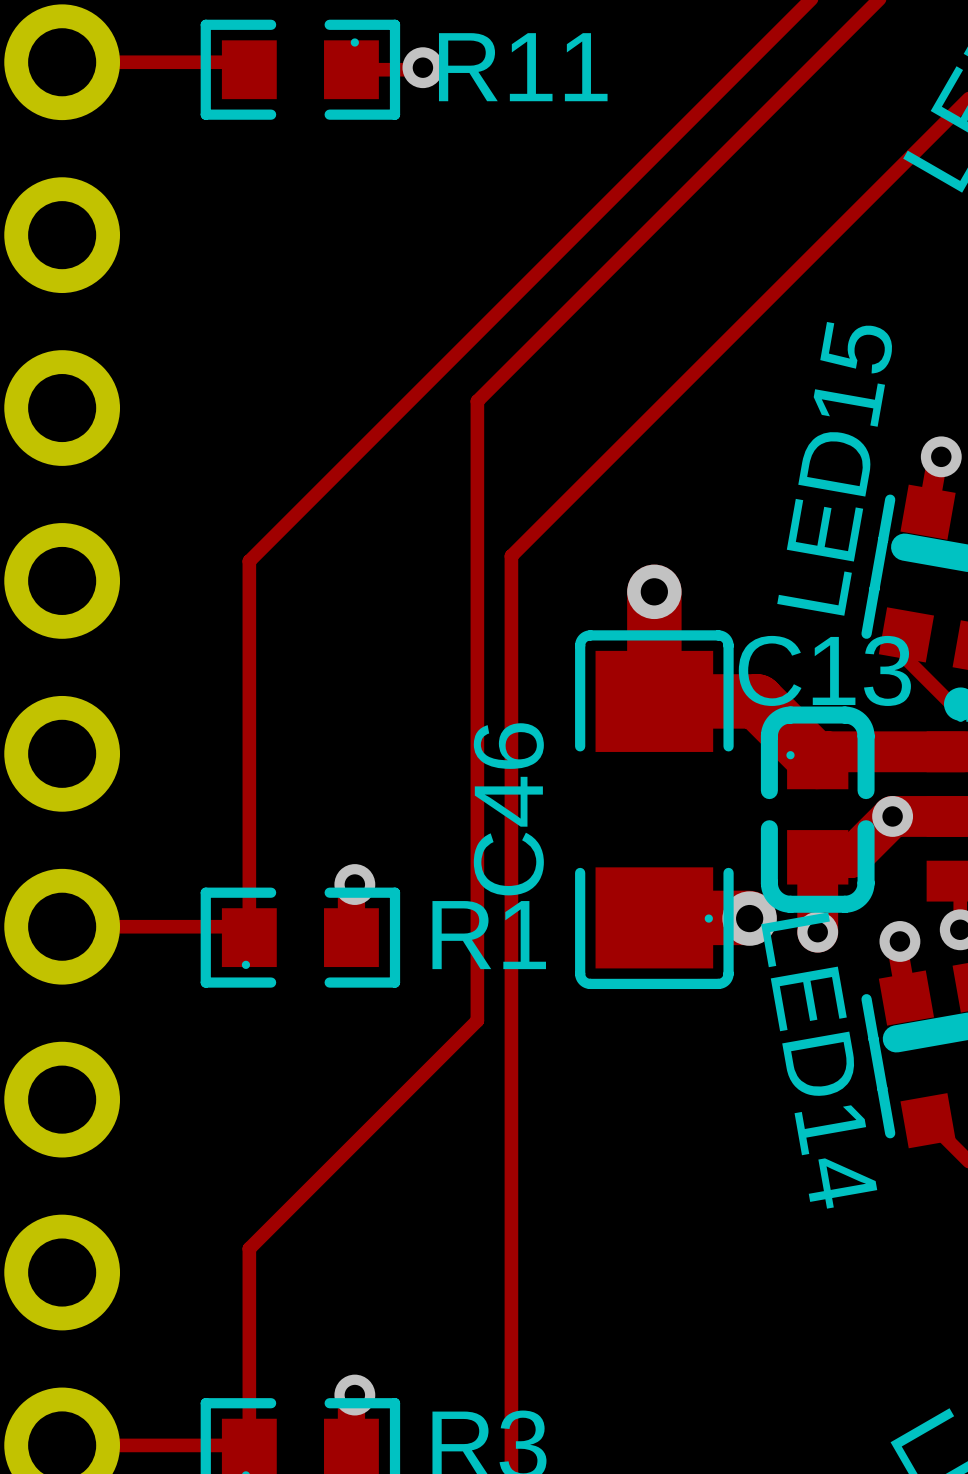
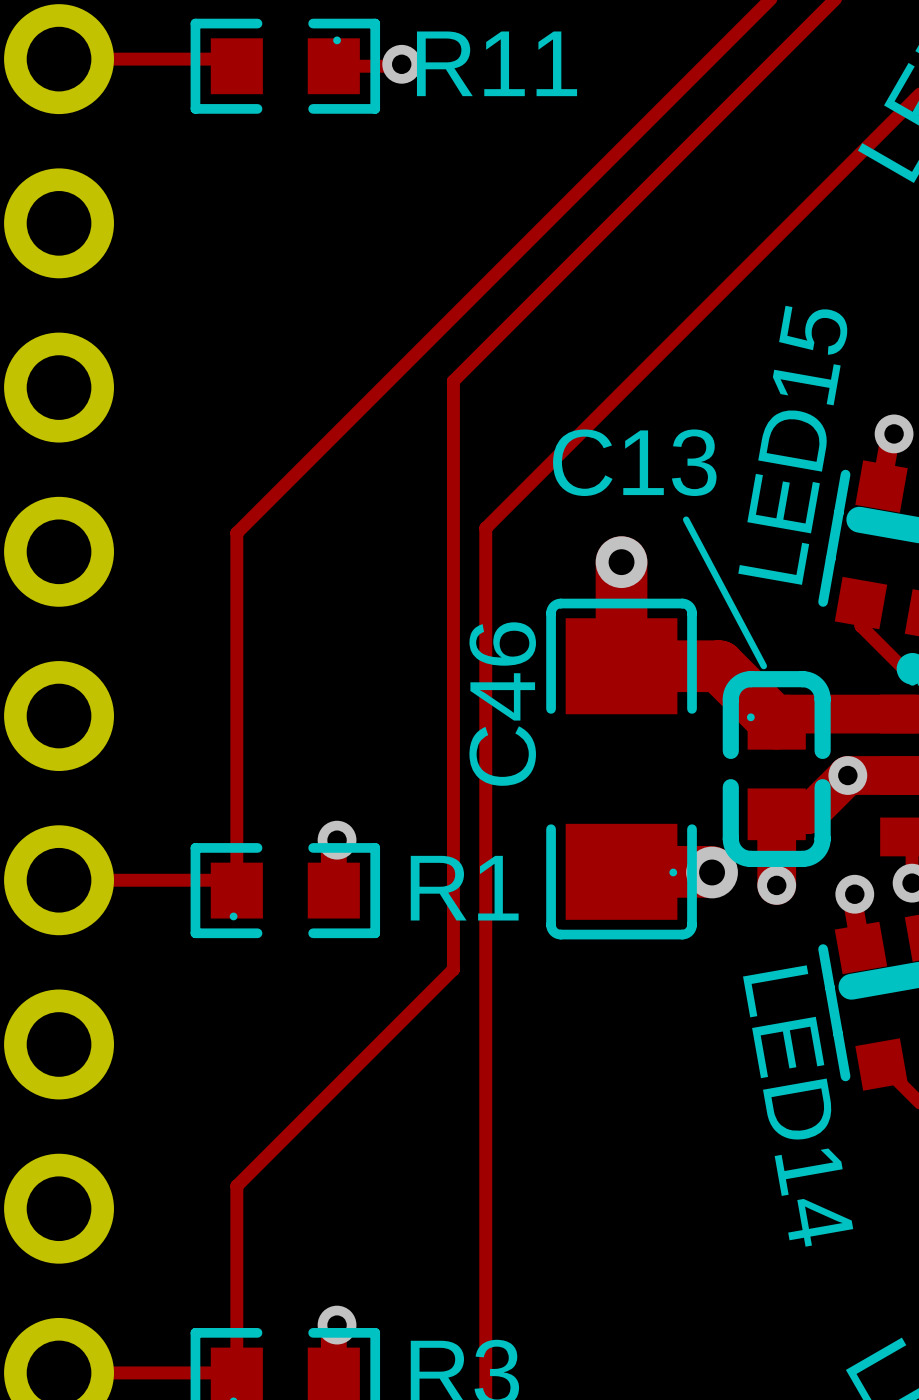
line: none -> (686, 519) (763, 666)
C13 name position: C13 (824, 670) -> C13 (634, 462)
C46 name position: C46 (508, 809) -> C46 (502, 704)
LED14 name position: LED14 (819, 1060) -> LED14 (798, 1106)

